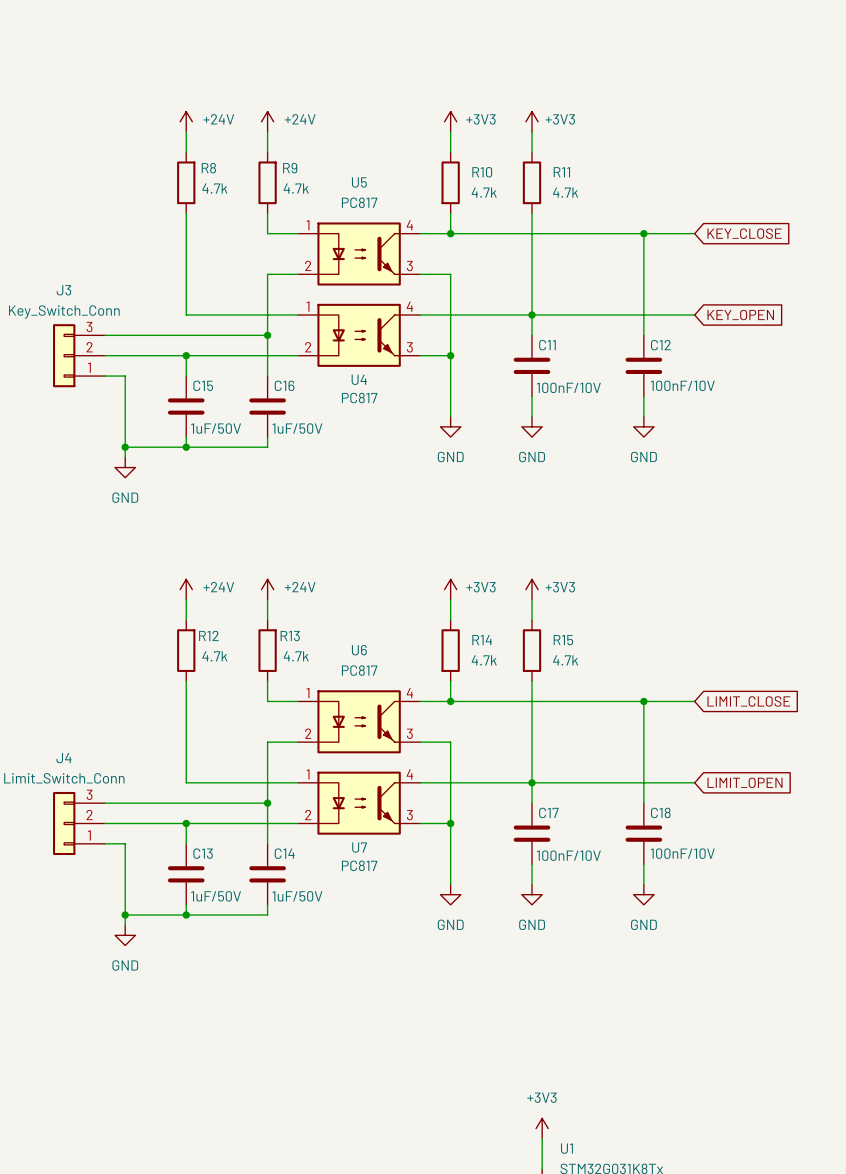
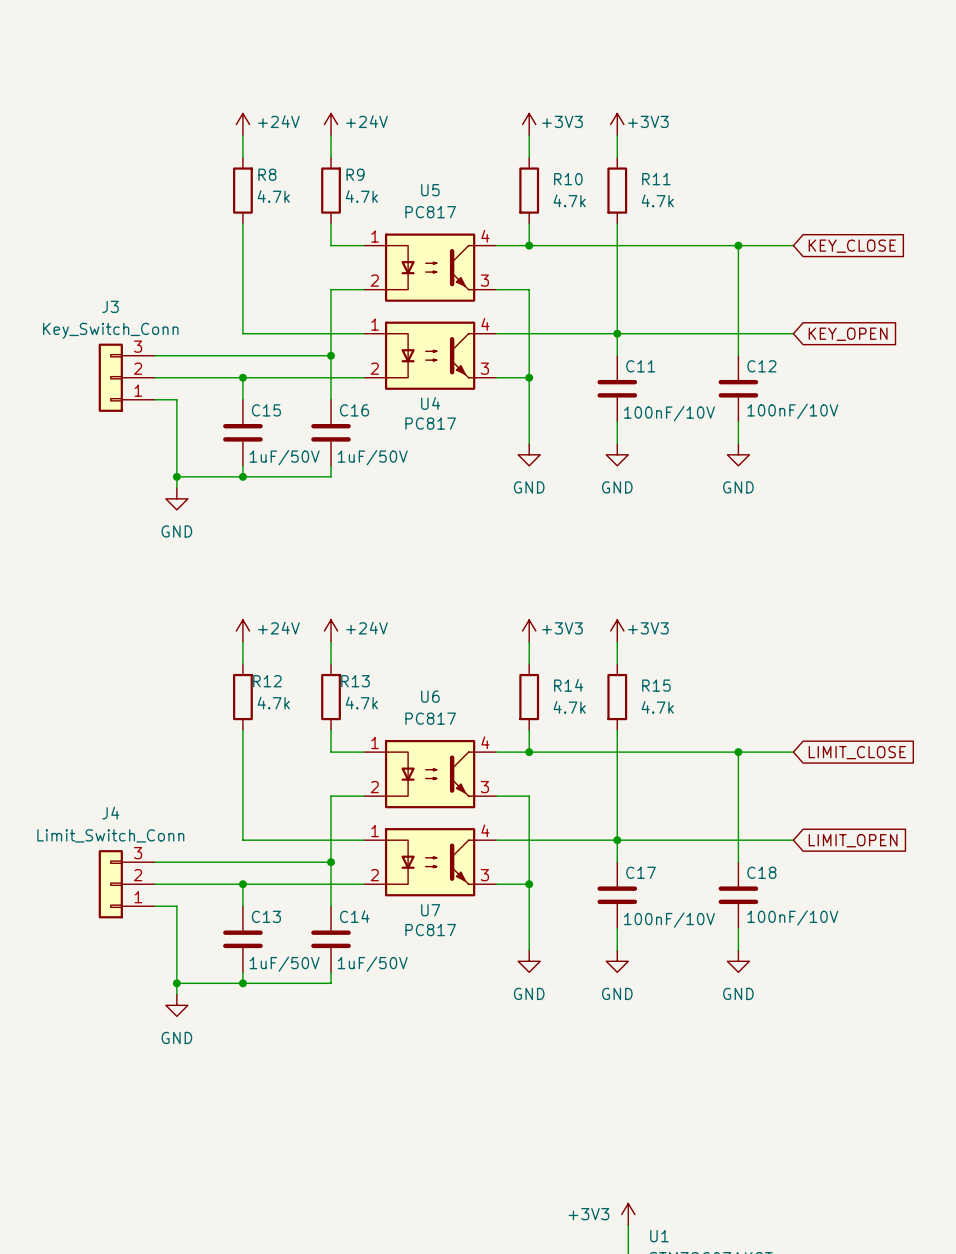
power symbol text position: +3V3 (541, 1097) -> +3V3 (588, 1214)

